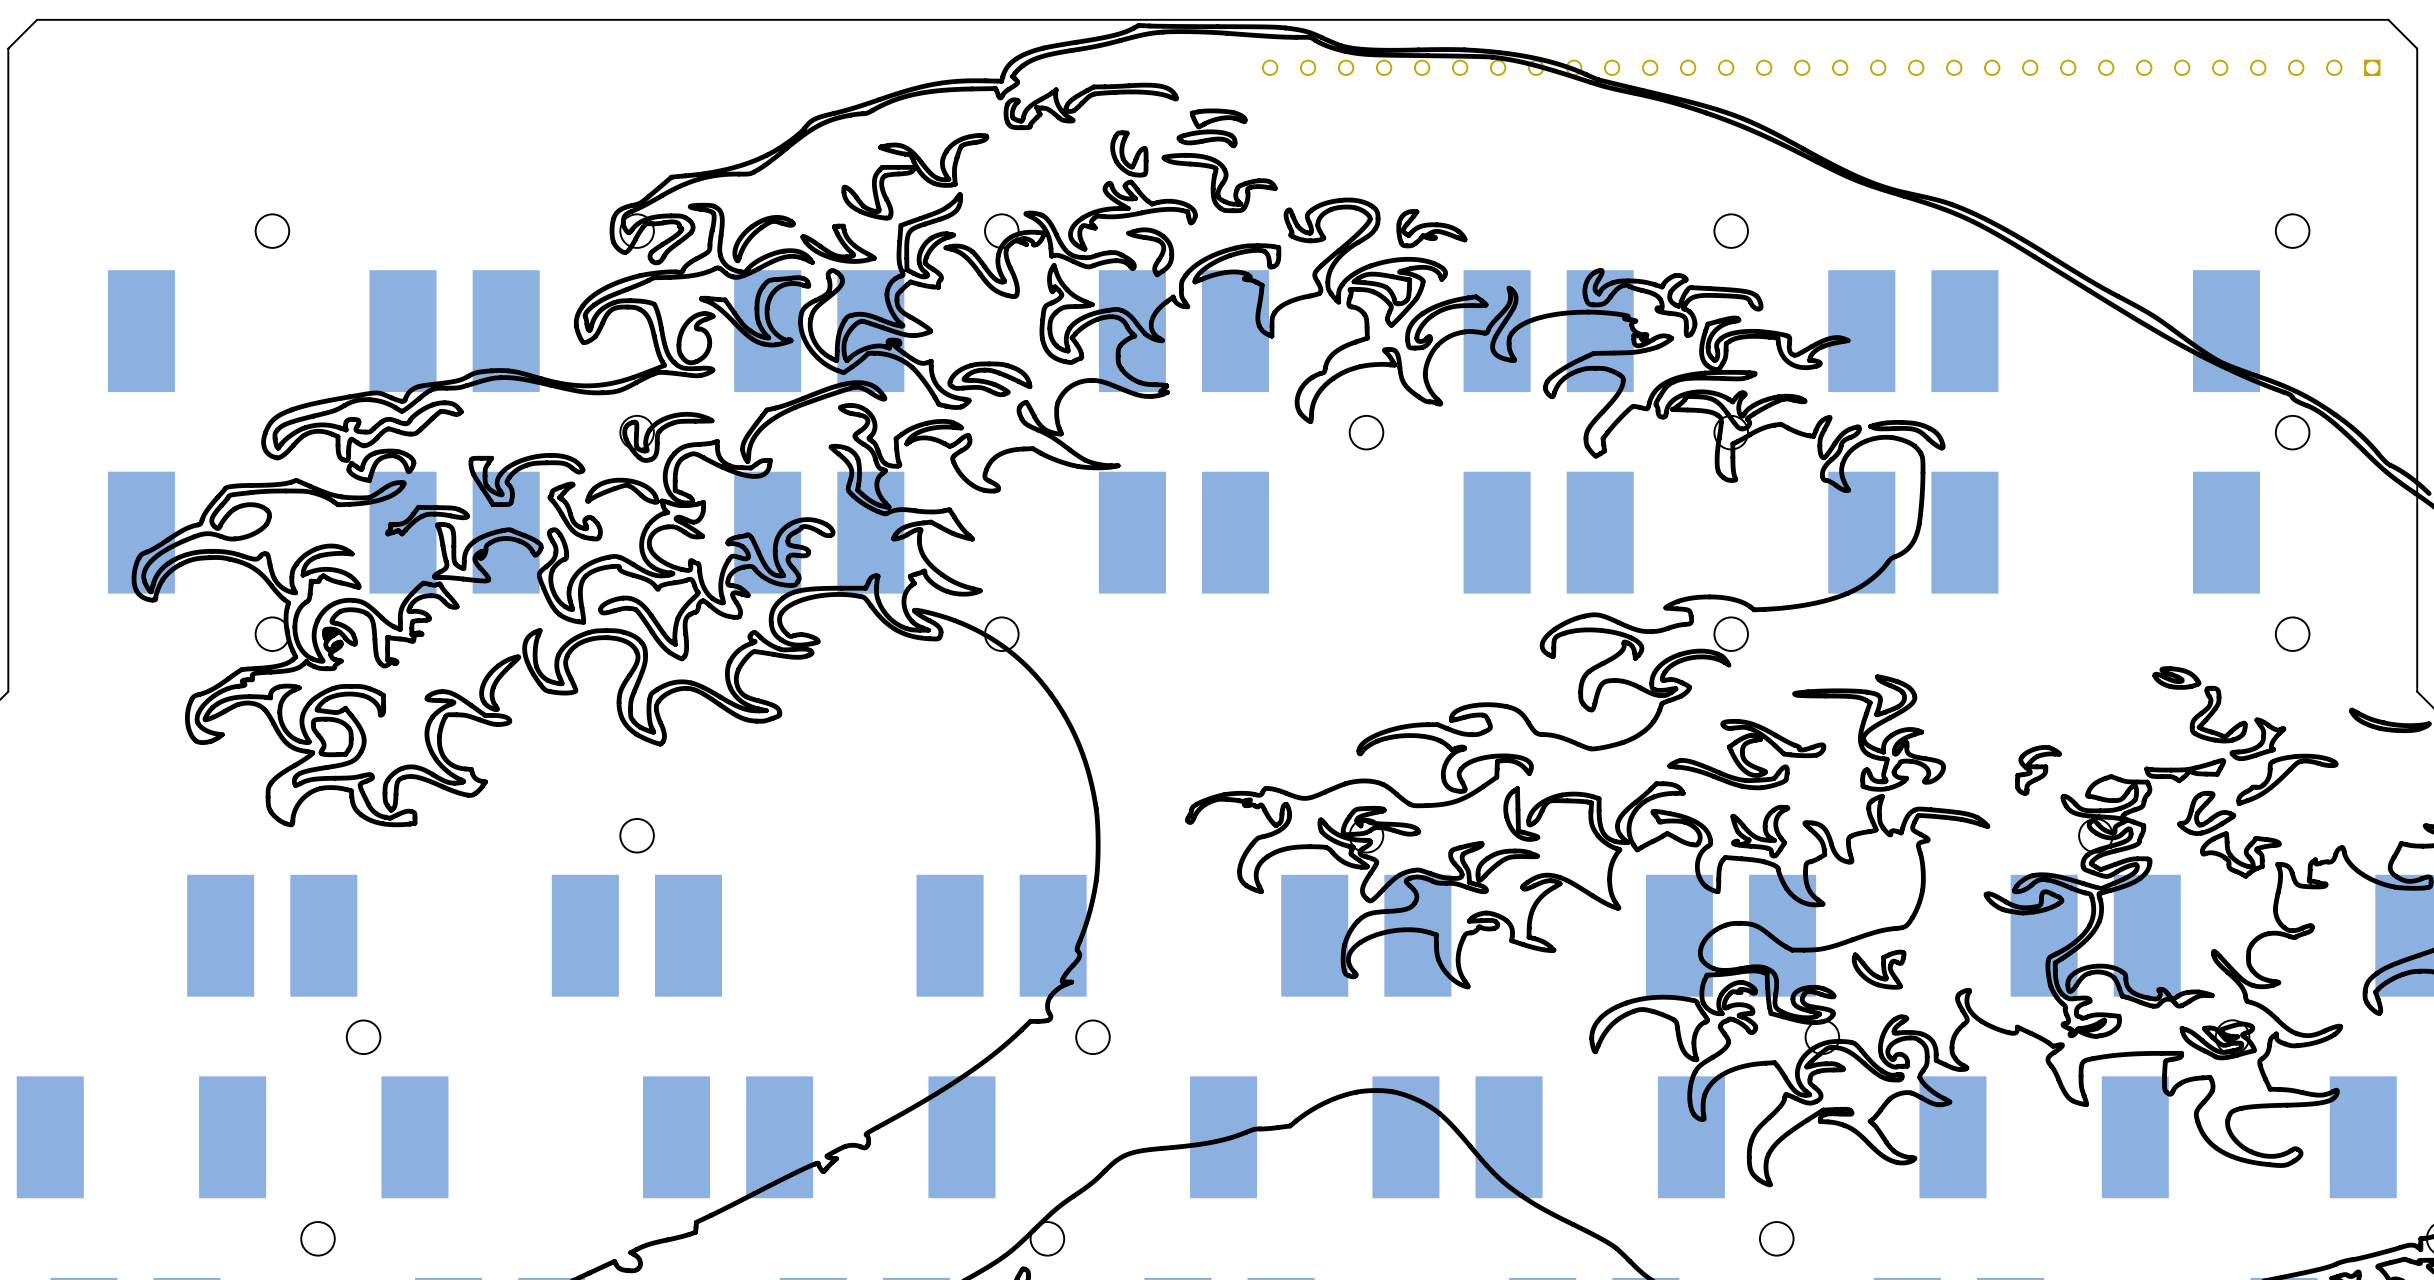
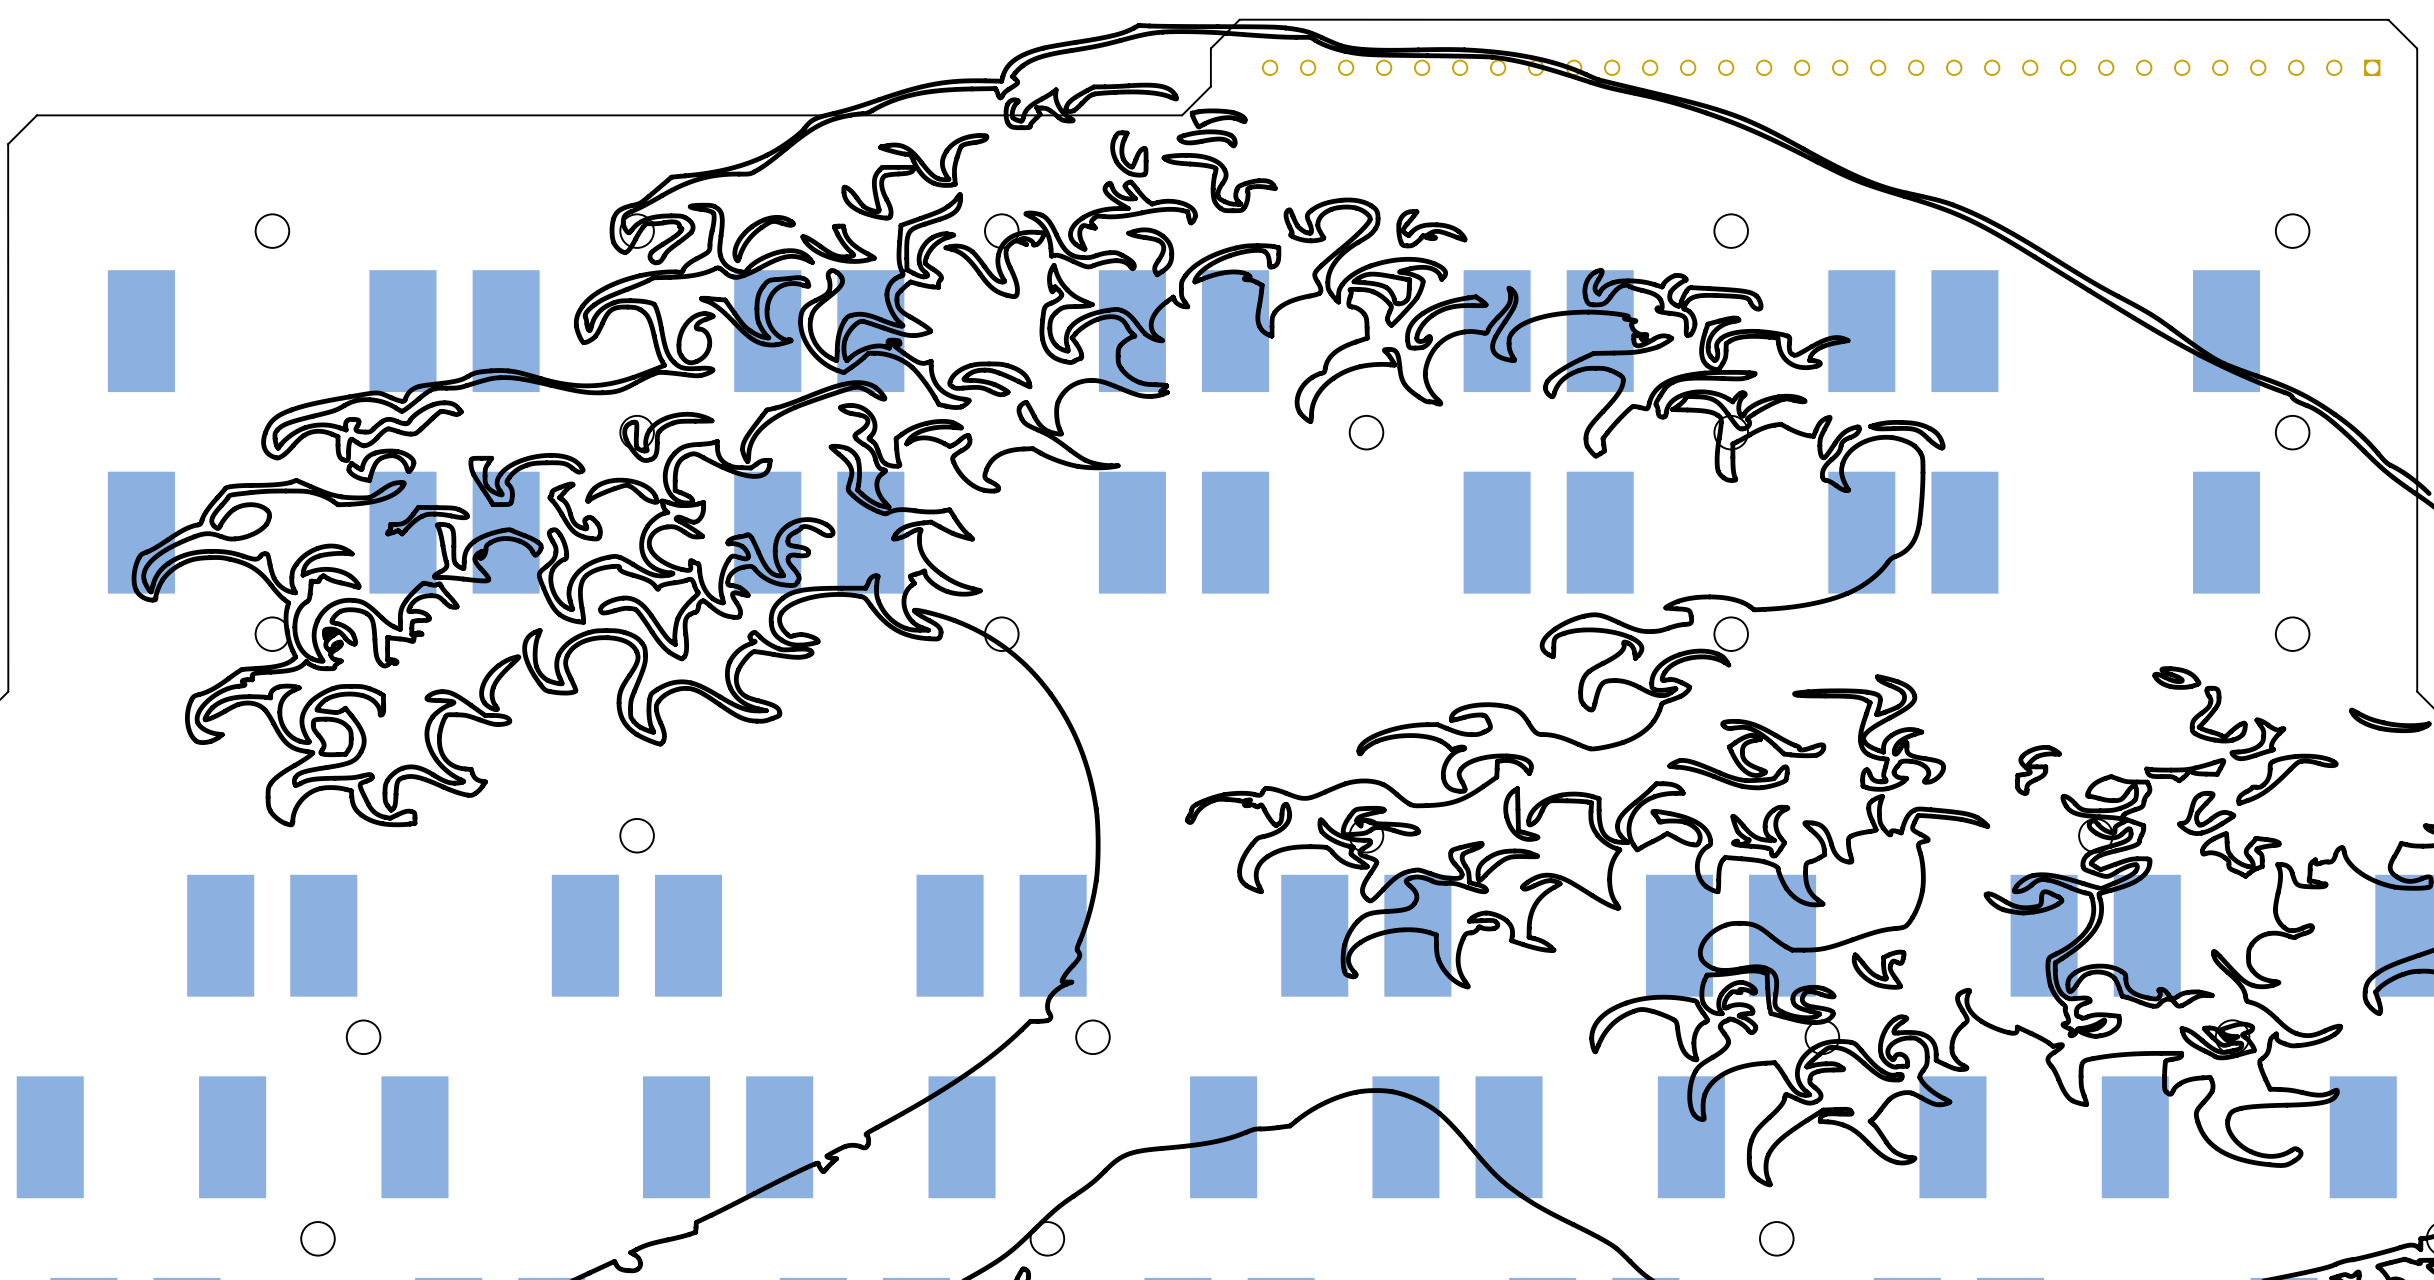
board edge: (2388, 19) (37, 19) (8, 48) (8, 691) -> (2388, 19) (1239, 19) (1210, 48) (1210, 86) (1182, 115) (36, 115) (8, 144) (8, 691)

